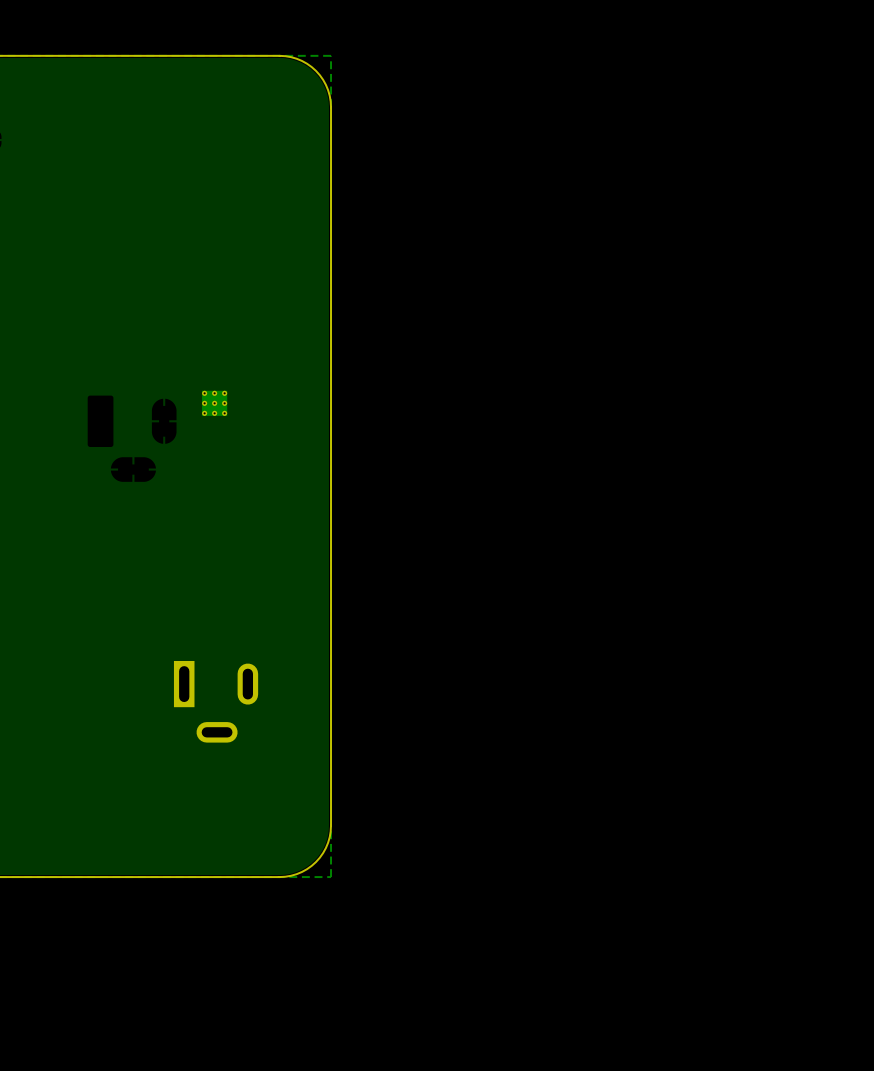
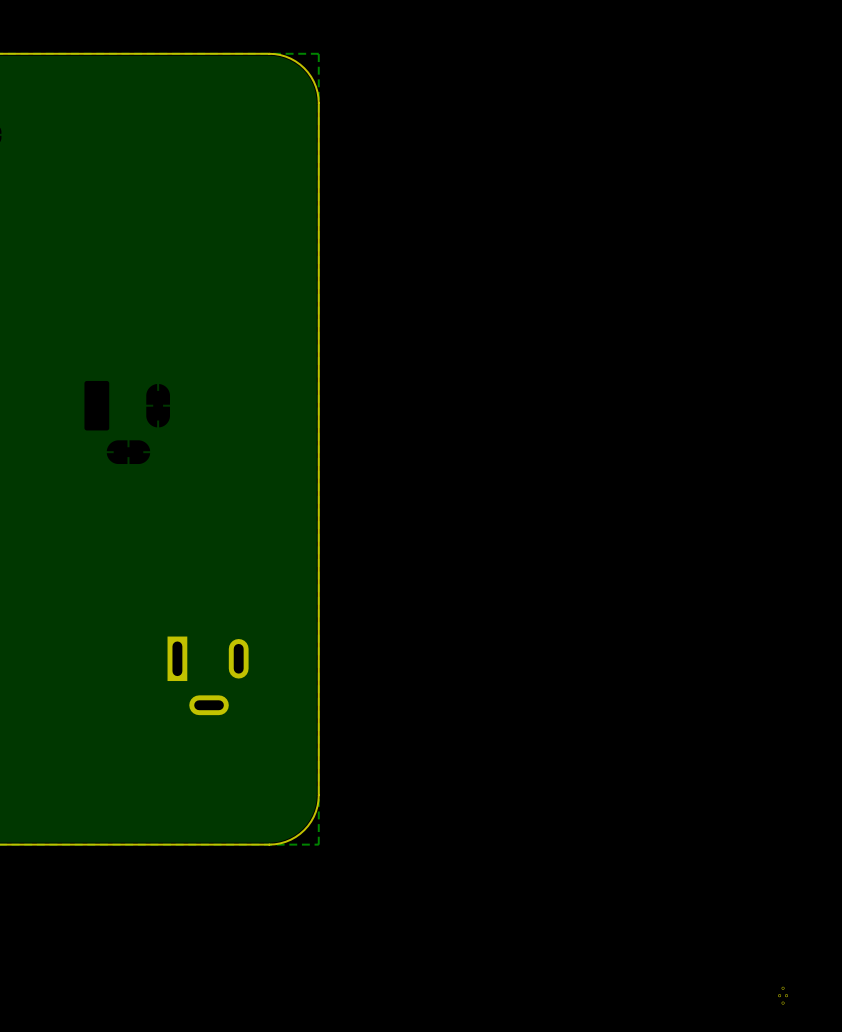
part: (214, 403) -> none
part: none -> (783, 995)

